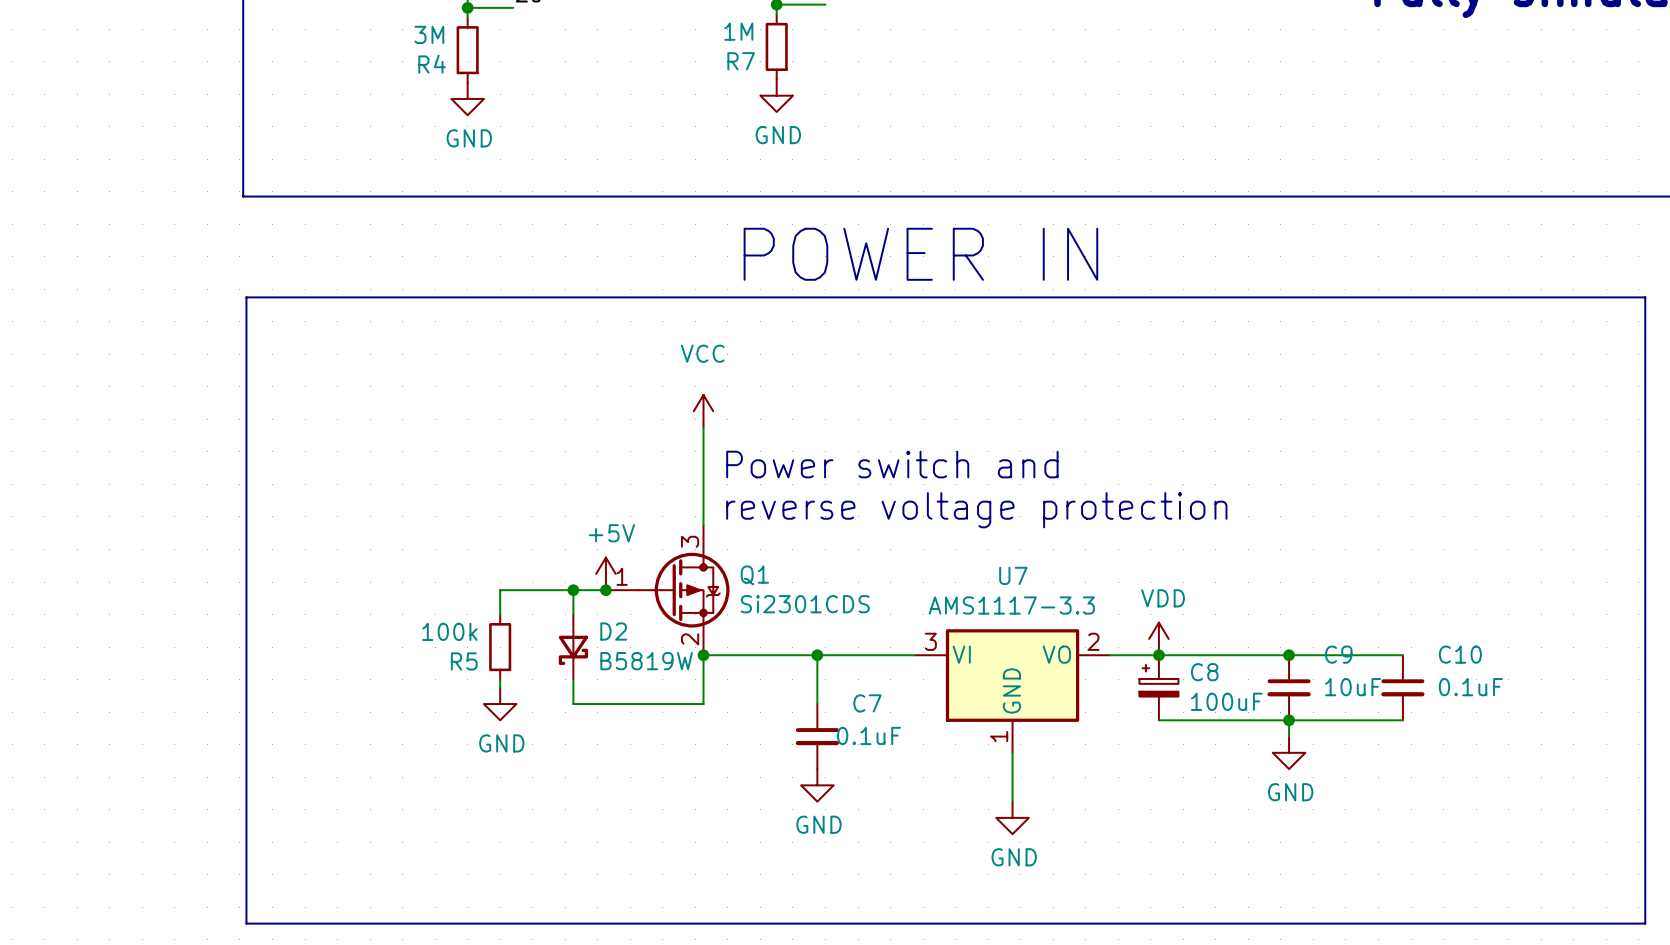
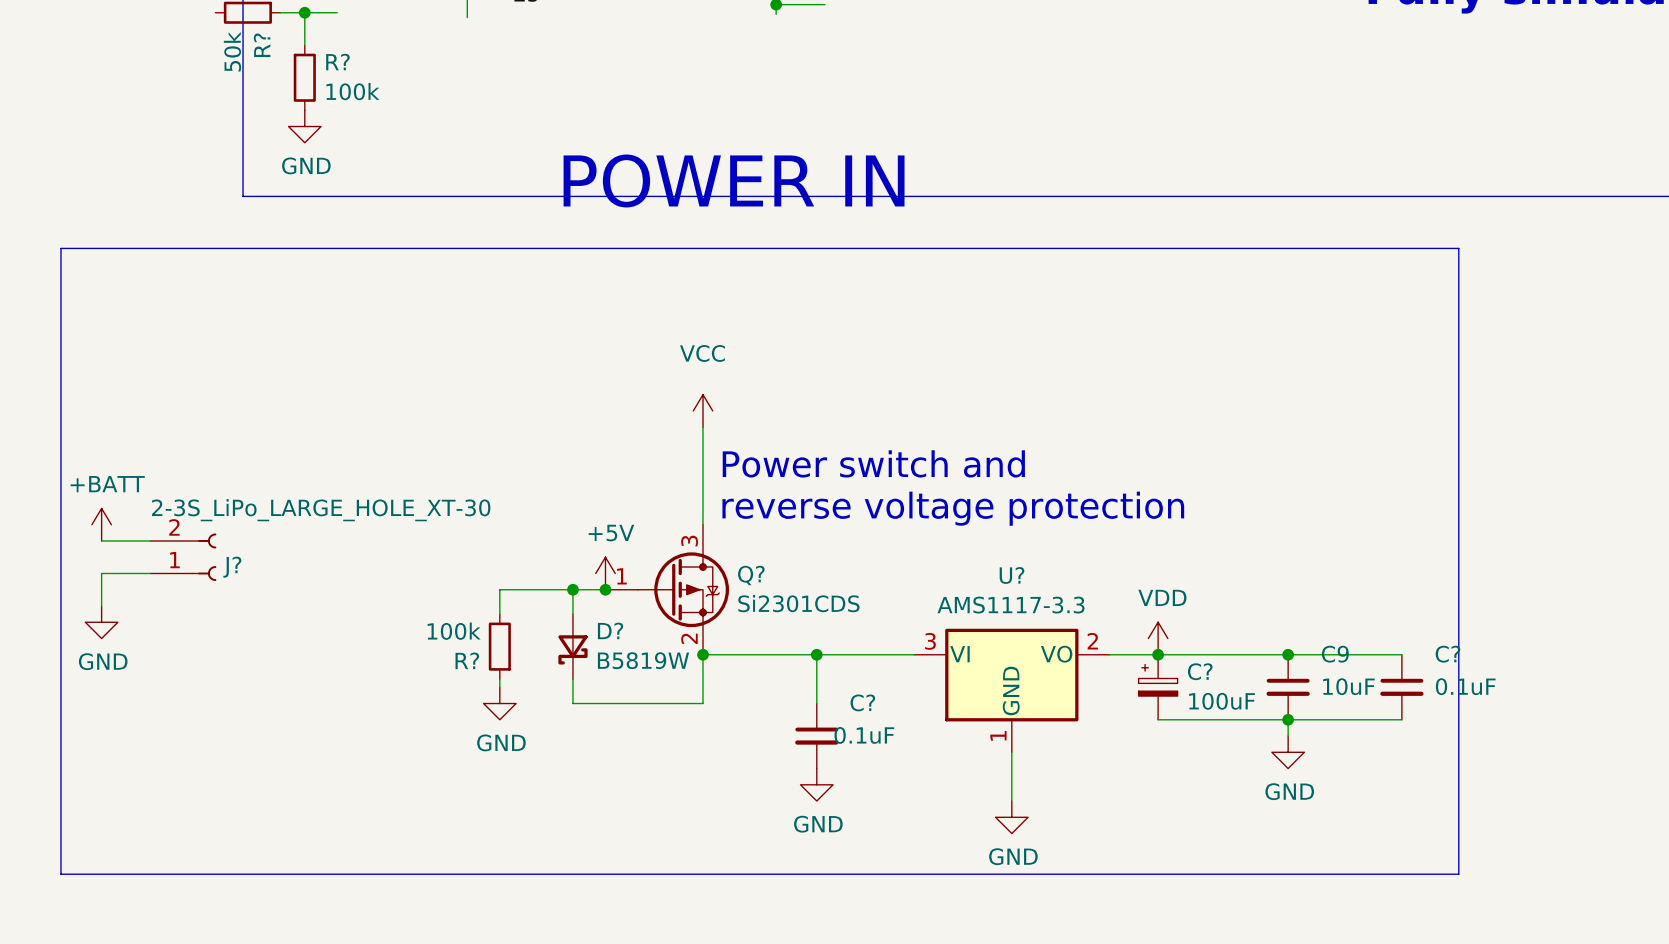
wire: (467, 7) (513, 7) -> none
junction: (467, 7) -> none
R?: none -> 50k (247, 12)
wire: none -> (280, 12) (337, 12)
wire: none -> (304, 12) (304, 45)
junction: none -> (304, 12)
R7: 1M (776, 46) -> none
R4: 3M (467, 50) -> none
R?: none -> 100k (304, 77)
power symbol: GND (776, 95) -> none
power symbol position: GND (467, 98) -> GND (304, 126)
text position: POWER IN (920, 254) -> POWER IN (734, 180)
line: (246, 297) (1645, 297) (1645, 923) (246, 923) (246, 297) -> (60, 248) (1458, 248) (1458, 874) (60, 874) (60, 248)
power symbol: none -> +BATT (101, 524)
wire: none -> (101, 540) (150, 540)
J?: none -> 2-3S_LiPo_LARGE_HOLE_XT-30 (183, 557)
wire: none -> (150, 573) (101, 573) (101, 606)
Q1 name: Q1 (754, 575) -> Q? (751, 575)
U7 name: U7 (1013, 575) -> U? (1012, 575)
power symbol: none -> GND (101, 622)
D2 name: D2 (613, 631) -> D? (610, 630)
C10 name: C10 (1460, 654) -> C? (1447, 654)
R5 name: R5 (464, 661) -> R? (467, 660)
C8 name: C8 (1204, 672) -> C? (1200, 671)
C7 name: C7 (867, 703) -> C? (862, 702)

